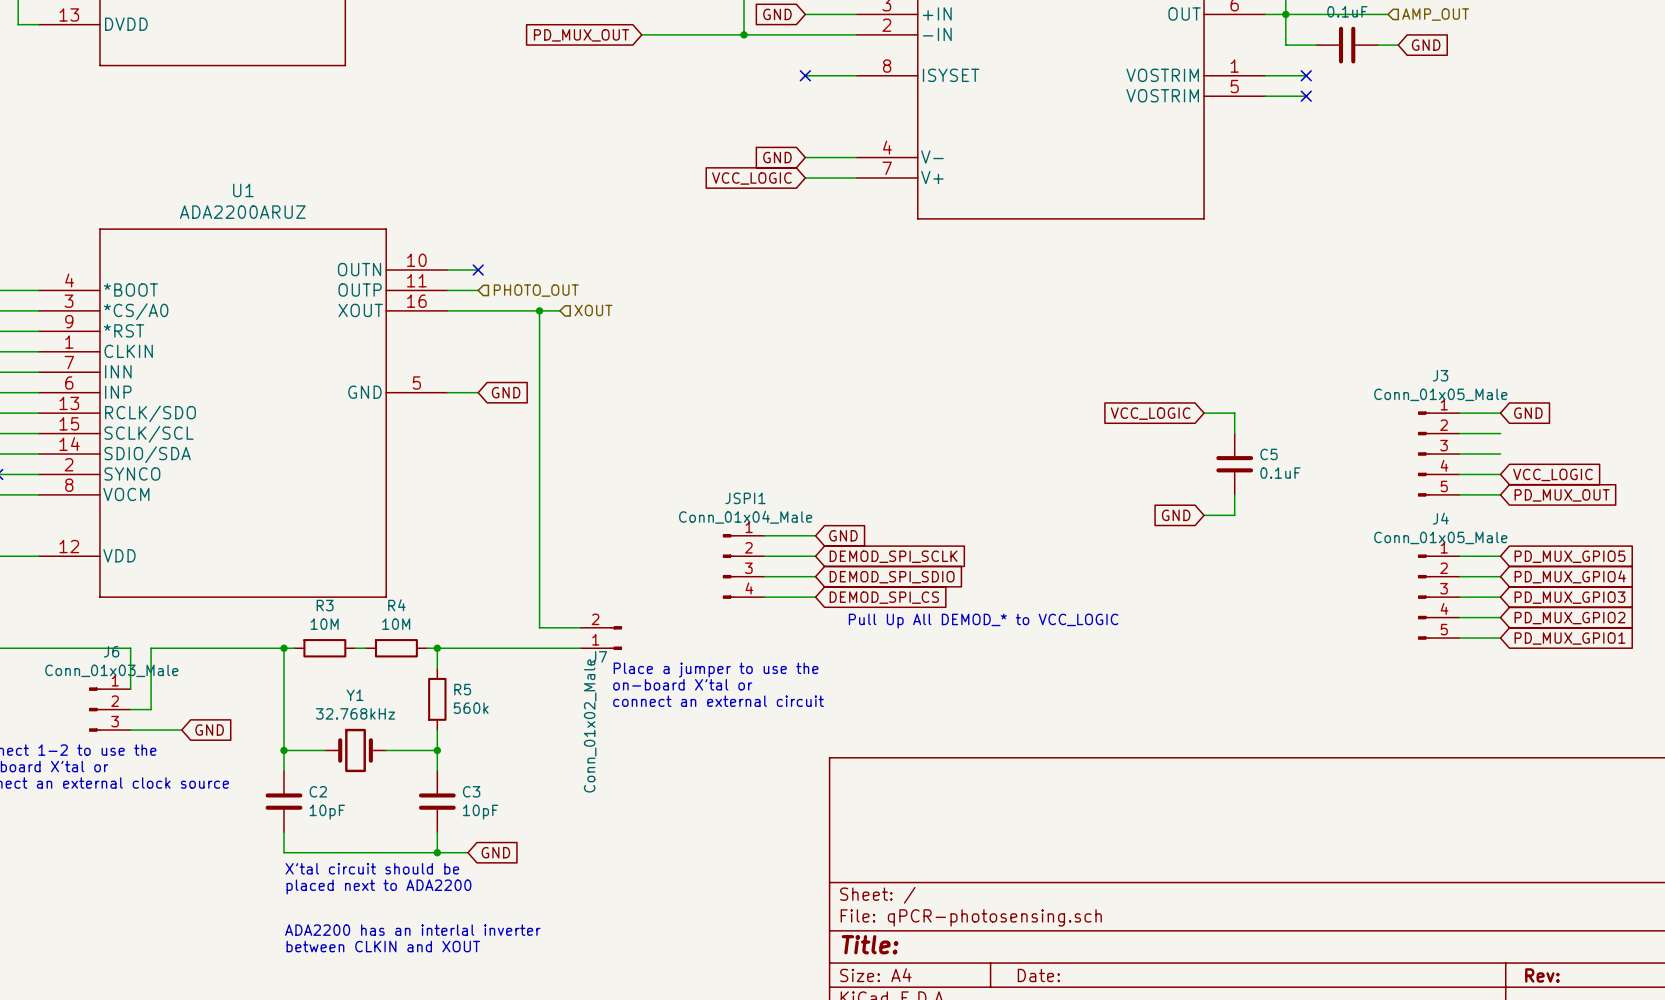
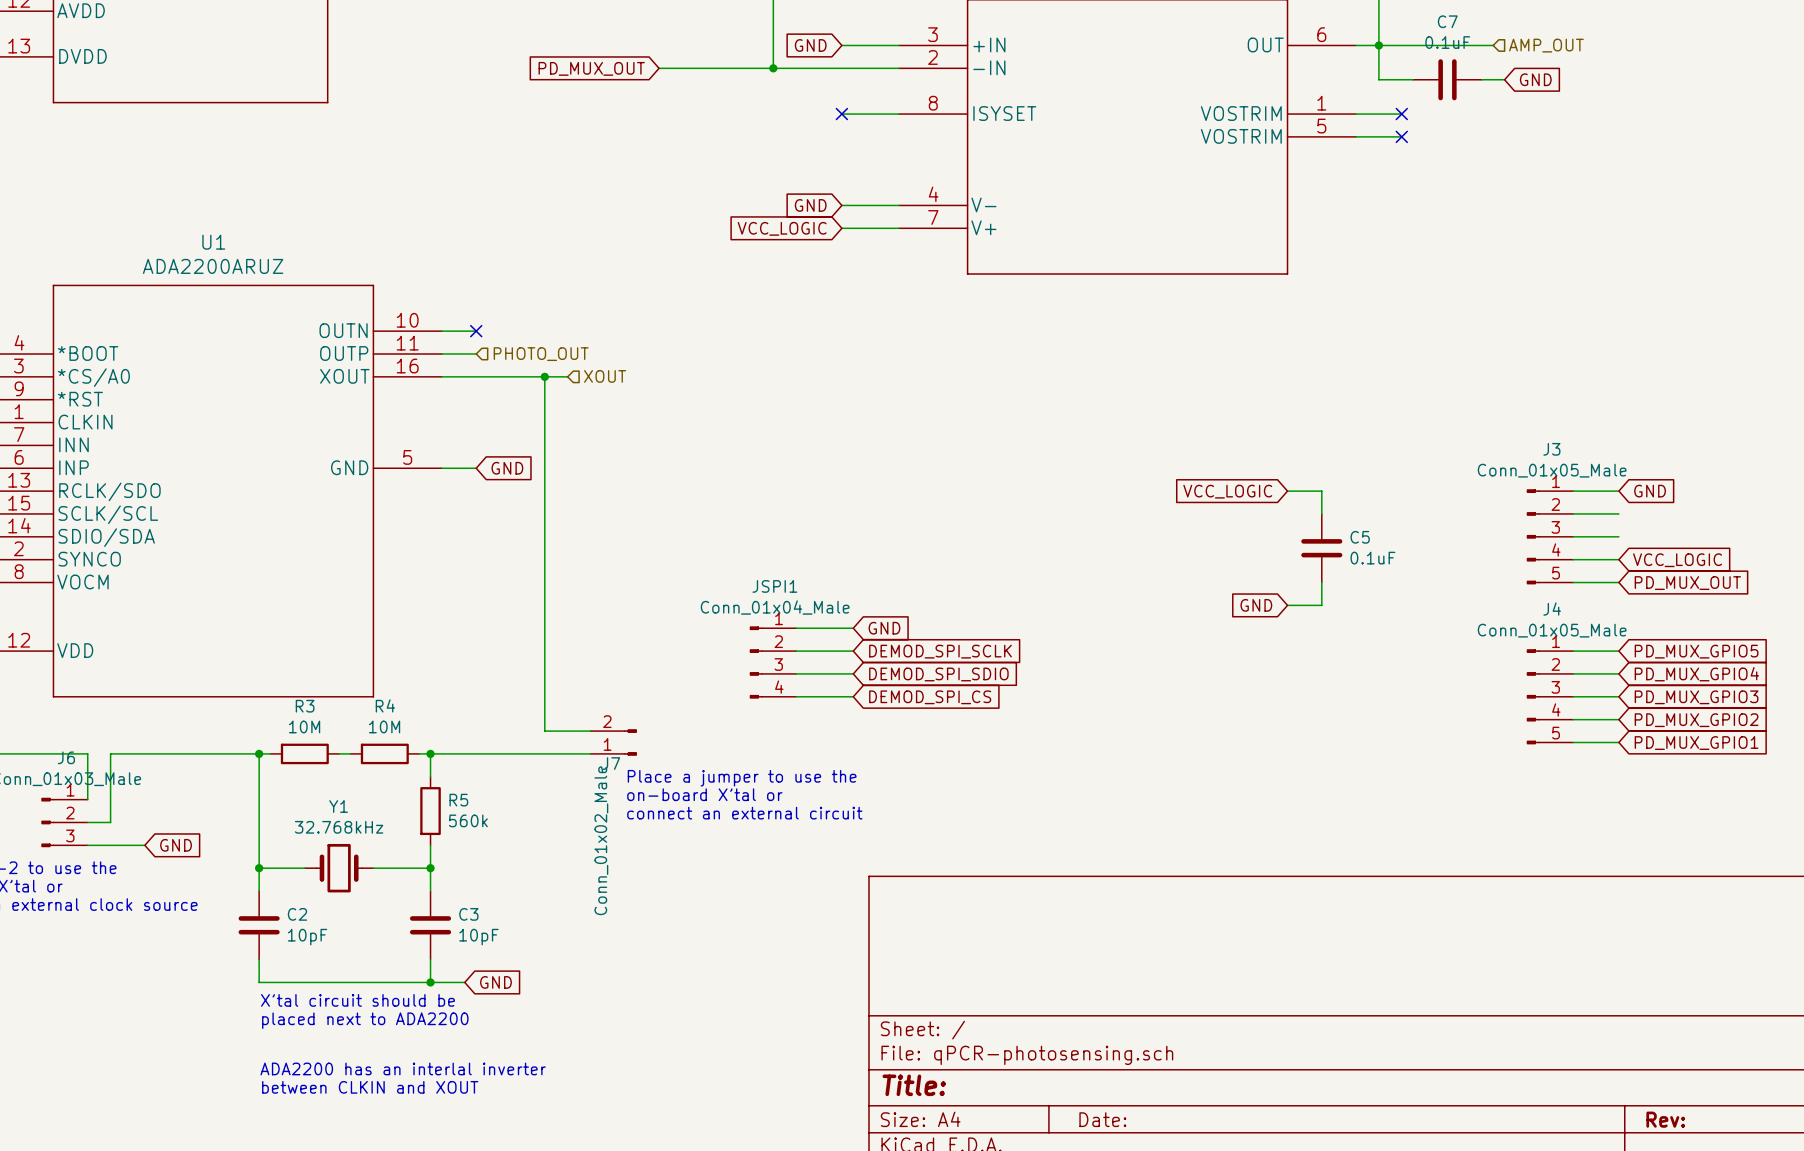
text: Pull Up All DEMOD_* to VCC_LOGIC (983, 621) -> none

